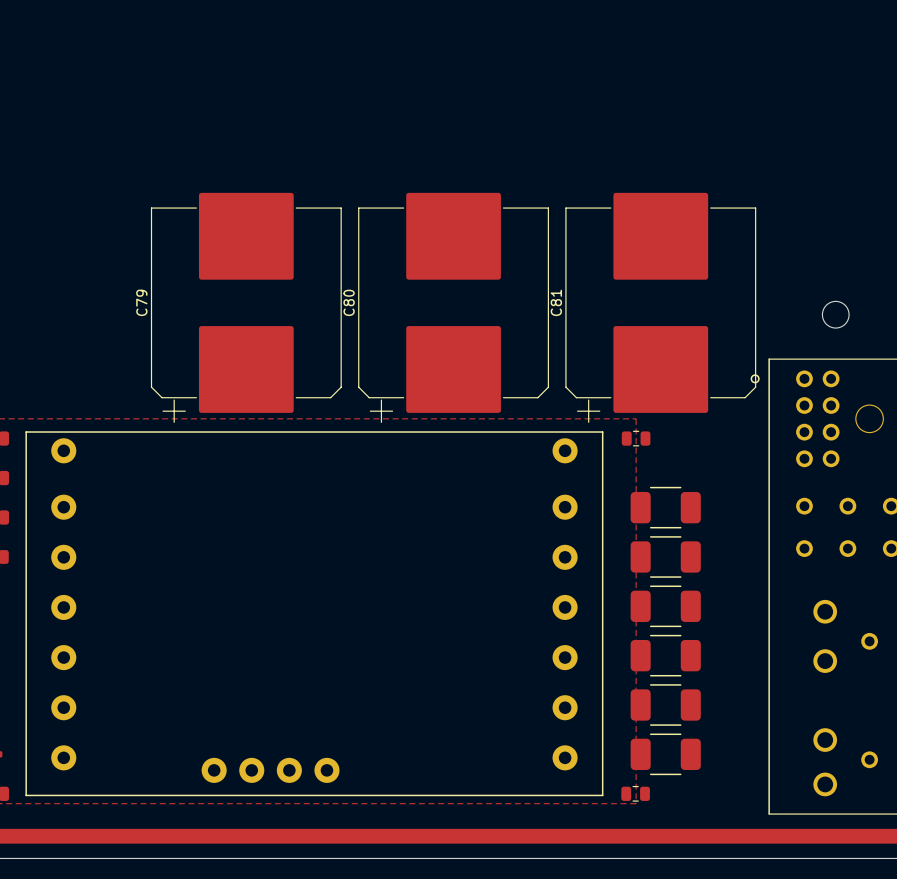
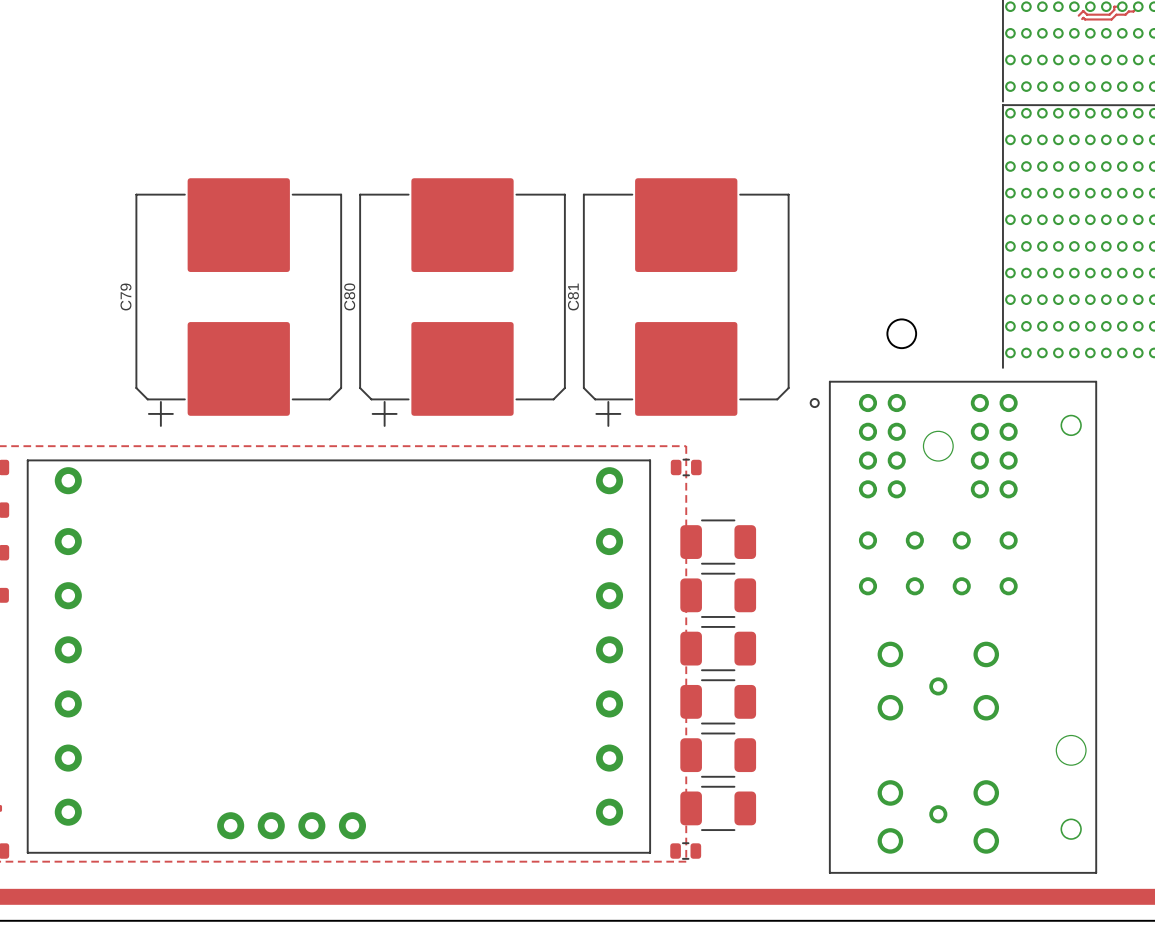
C79 position: (246, 307) -> (238, 302)
C80 position: (453, 307) -> (462, 302)
C81 position: (660, 307) -> (686, 302)

